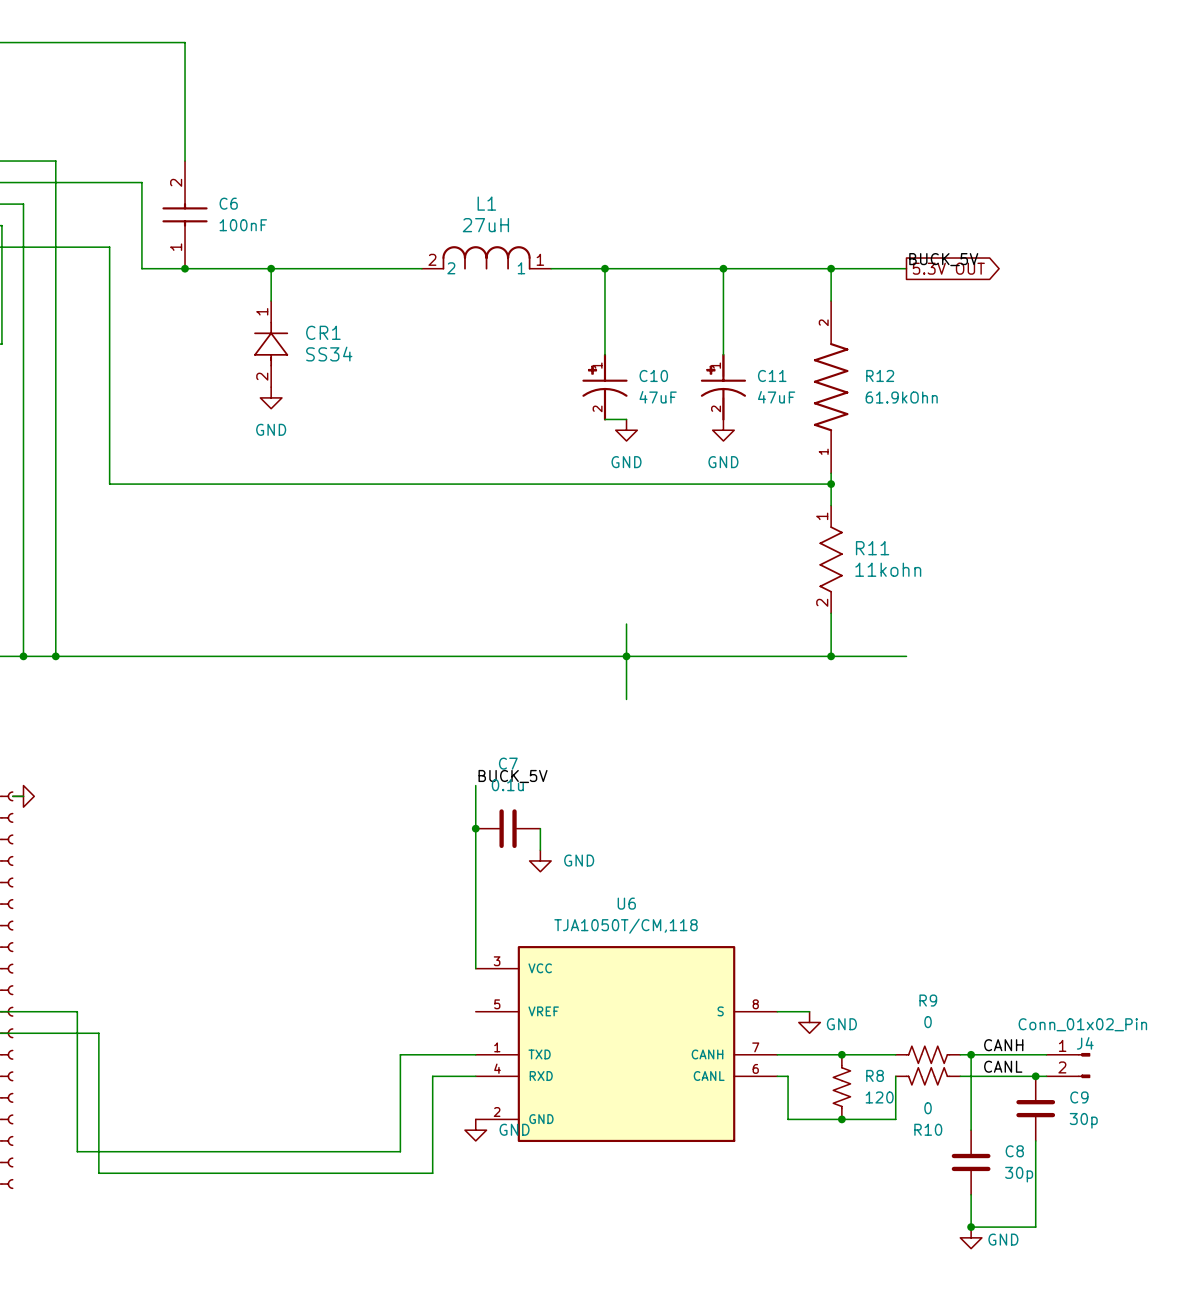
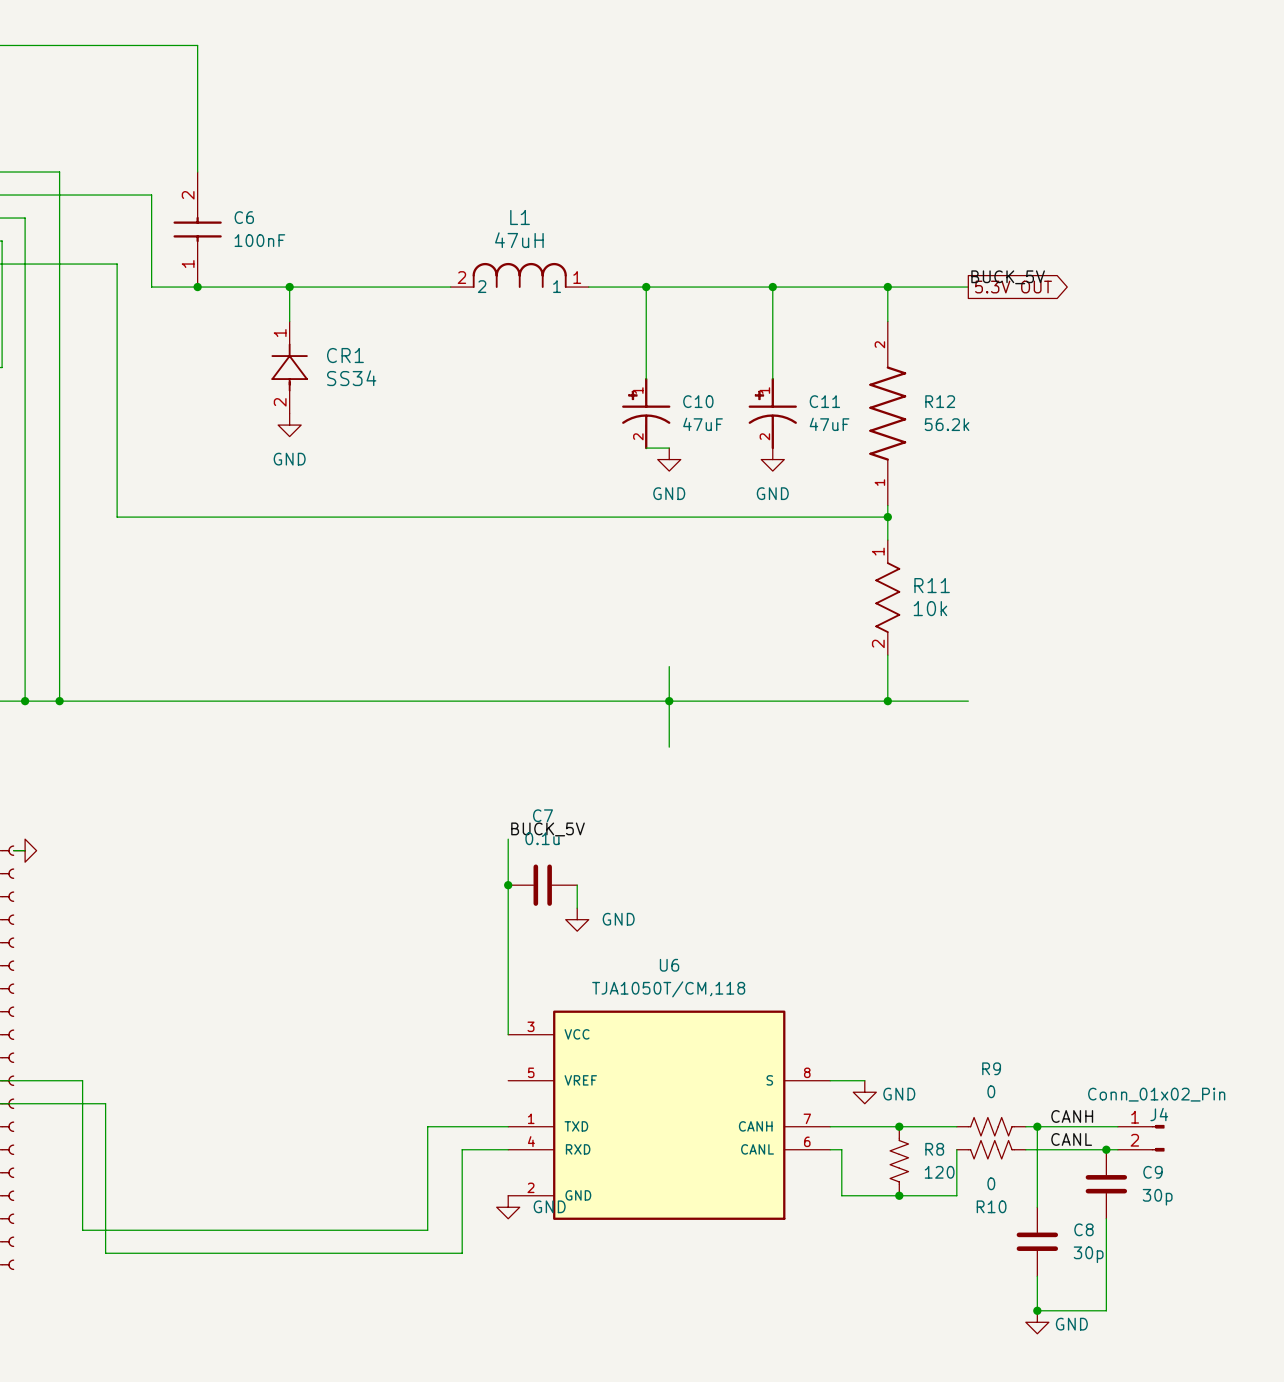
L1 value: 27uH (485, 225) -> 47uH (519, 240)
R12 value: 61.9kOhn (901, 397) -> 56.2k (947, 424)
R11 value: 11kohn (888, 569) -> 10k (930, 608)

